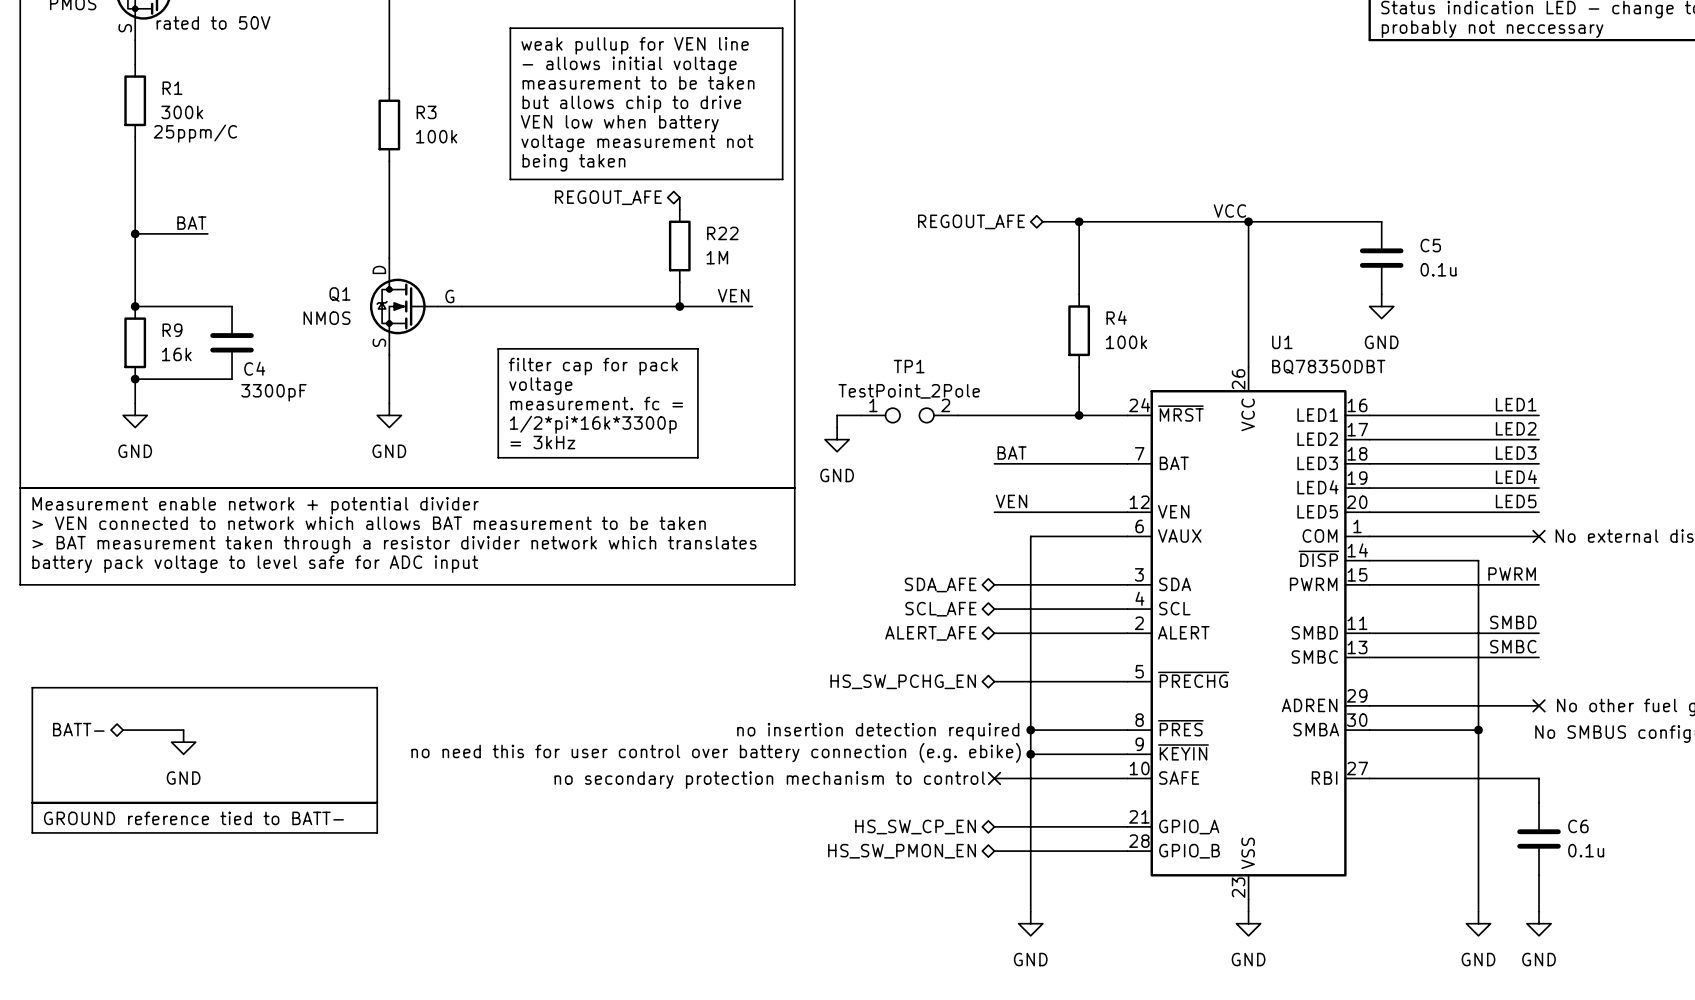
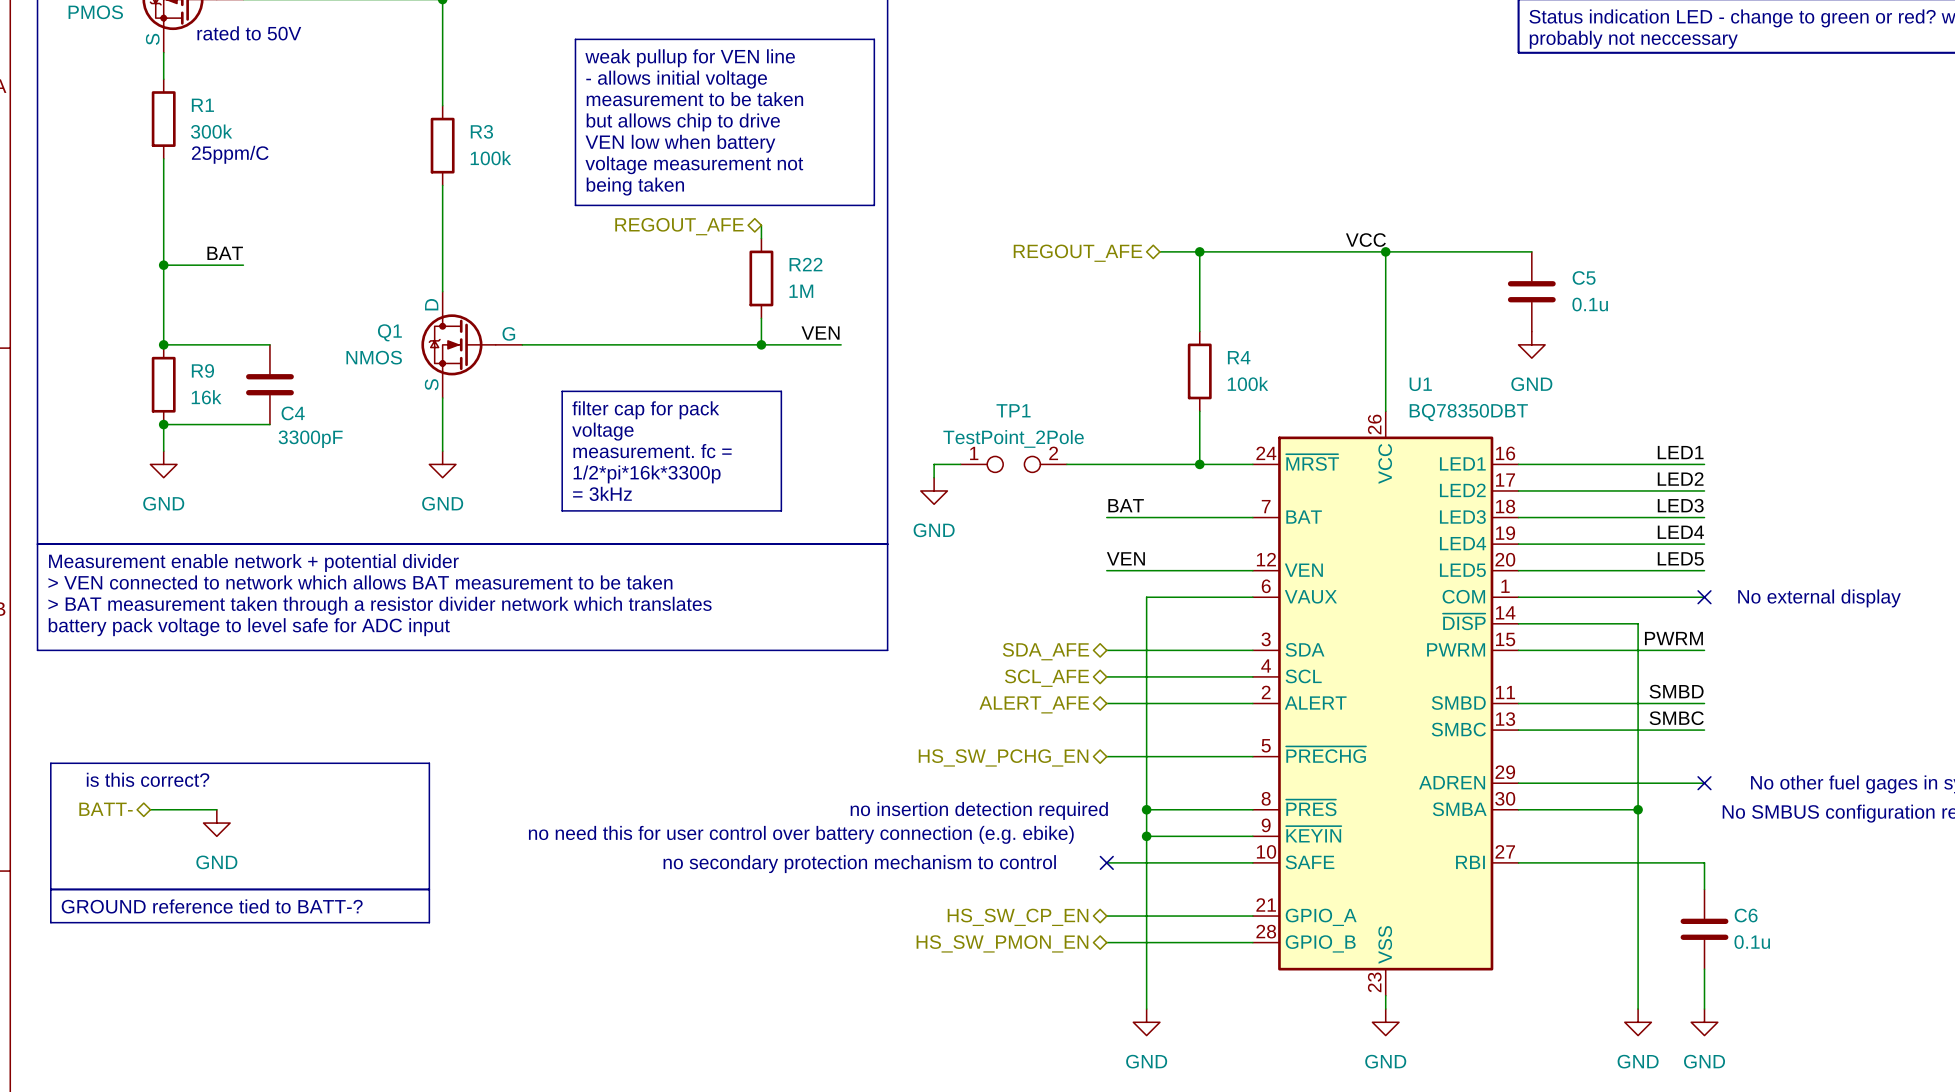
text: none -> is this correct? (148, 779)
text: GROUND reference tied to BATT- (193, 818) -> GROUND reference tied to BATT-? (212, 906)

